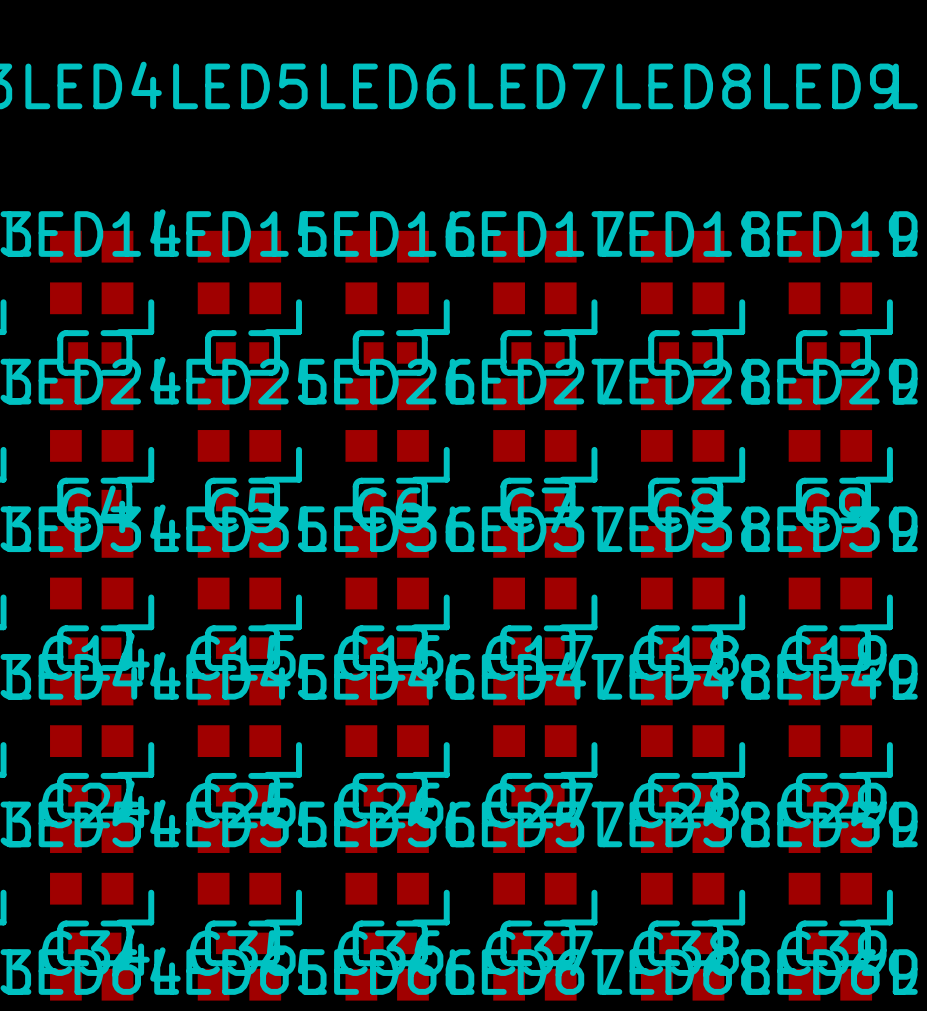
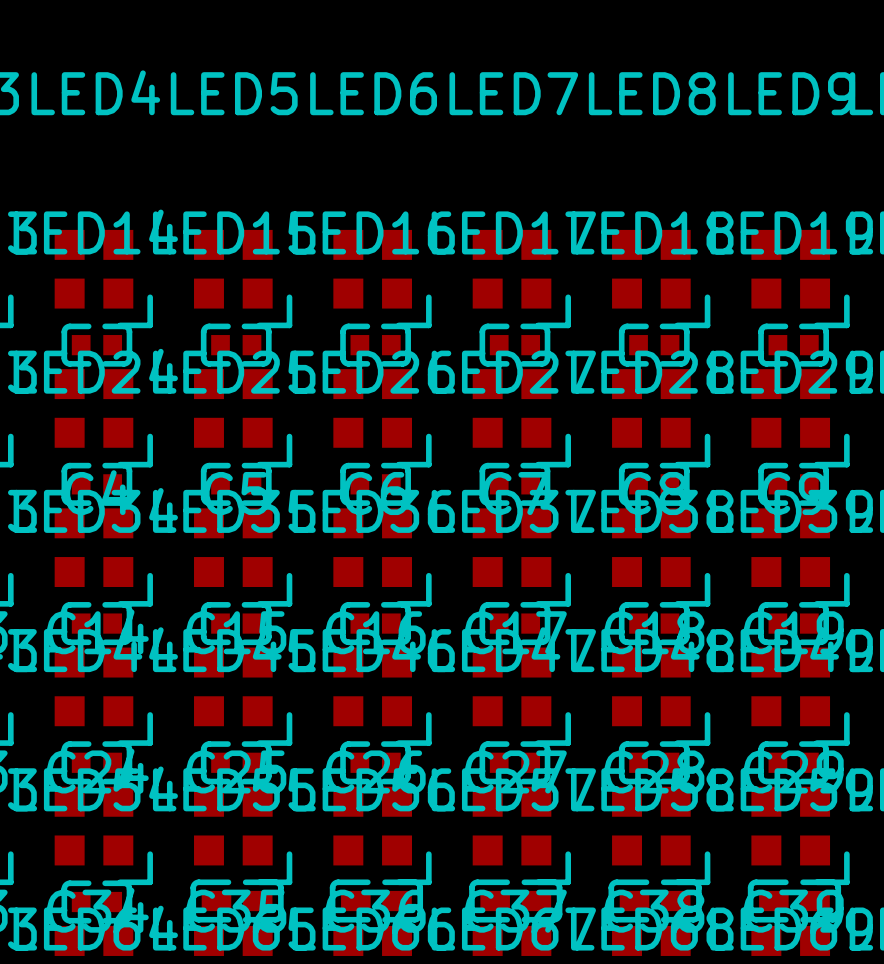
part footprint: [205, 920, 281, 967] -> [190, 879, 284, 923]
part footprint: [352, 920, 428, 967] -> [329, 879, 424, 923]
part footprint: [500, 920, 576, 967] -> [469, 879, 563, 923]
part footprint: [648, 920, 724, 967] -> [608, 879, 702, 923]
part footprint: [795, 920, 871, 967] -> [747, 879, 842, 923]

